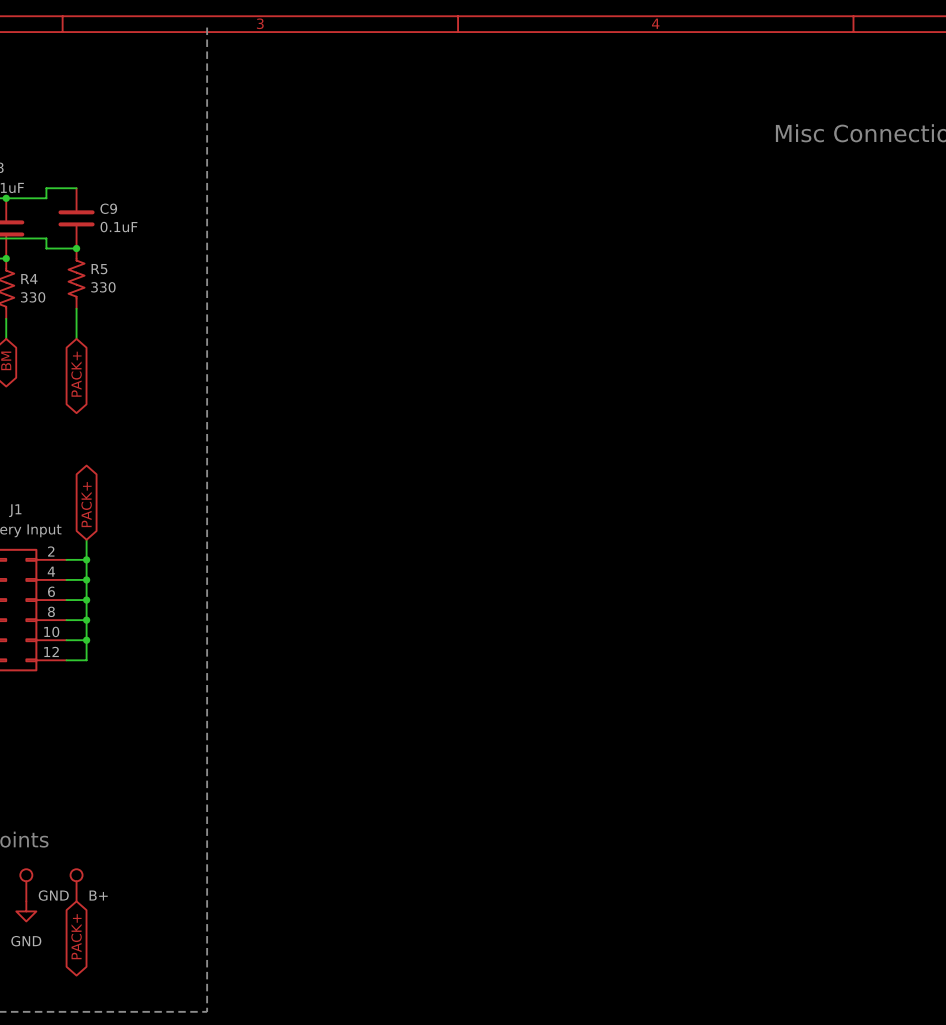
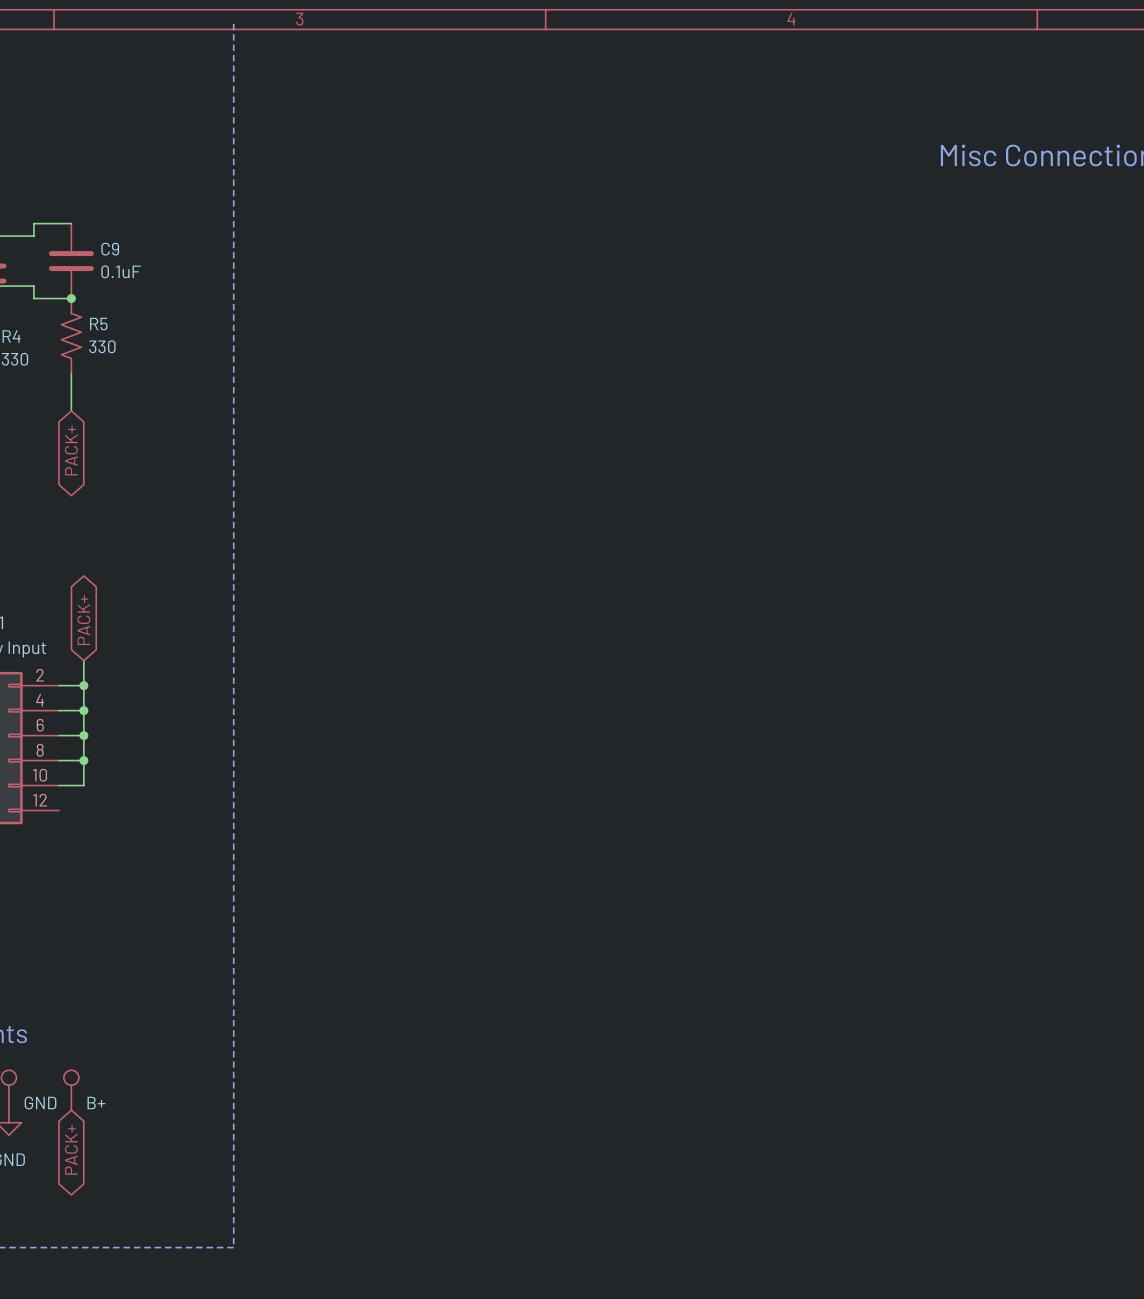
wire: (86, 640) (86, 660) (66, 660) -> none
junction: (86, 640) -> none

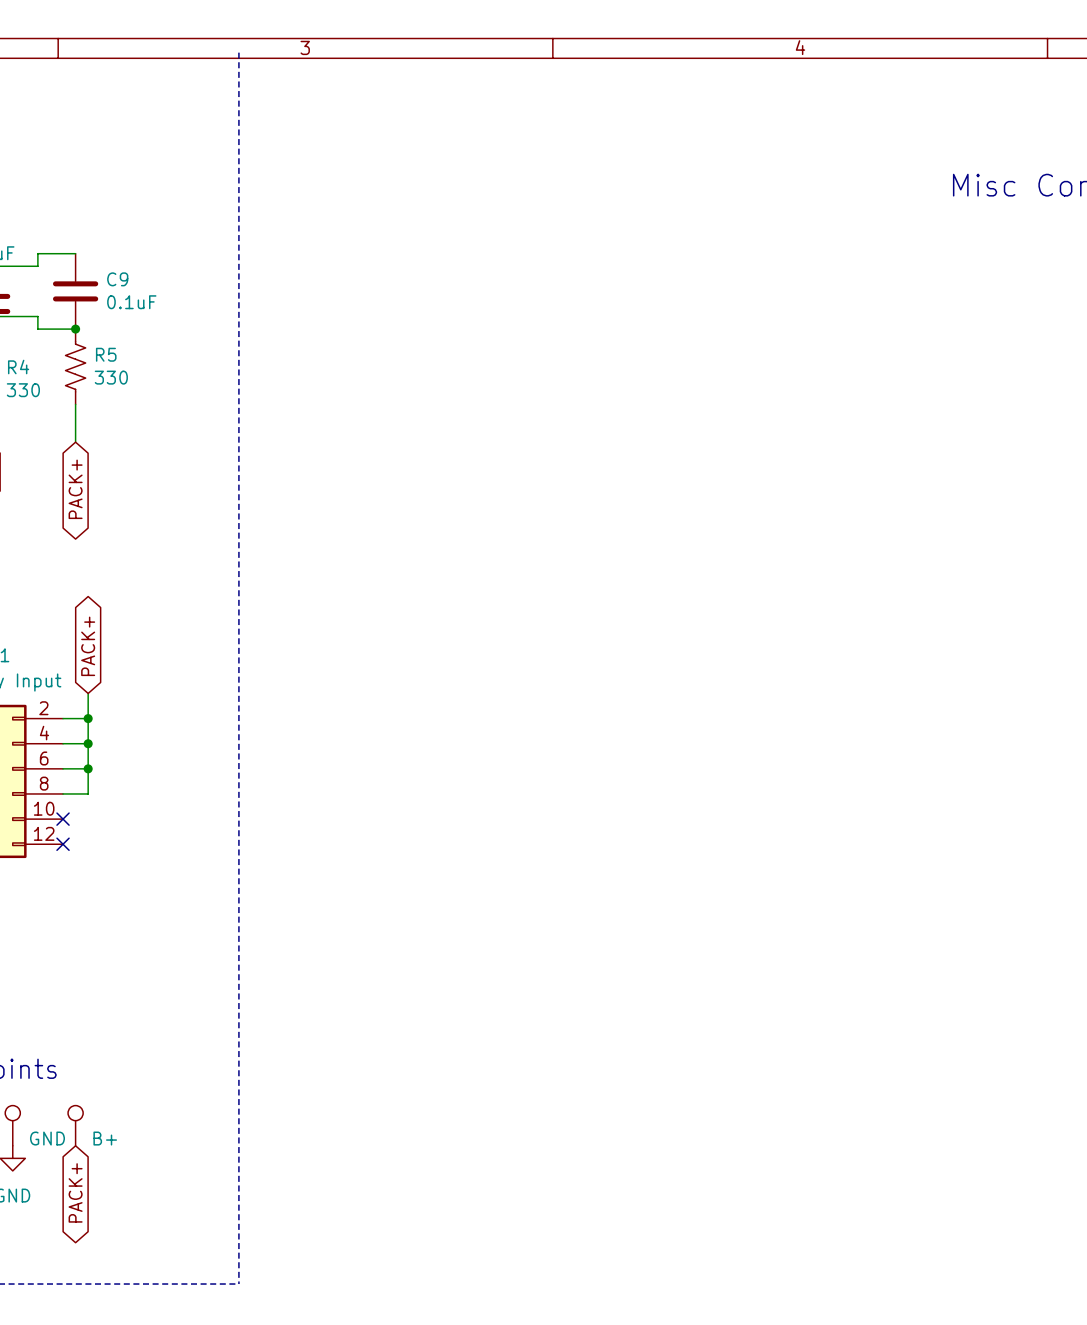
wire: (83, 760) (83, 785) (58, 785) -> none
junction: (83, 760) -> none
no-connect mark: none -> (63, 819)
no-connect mark: none -> (63, 844)

